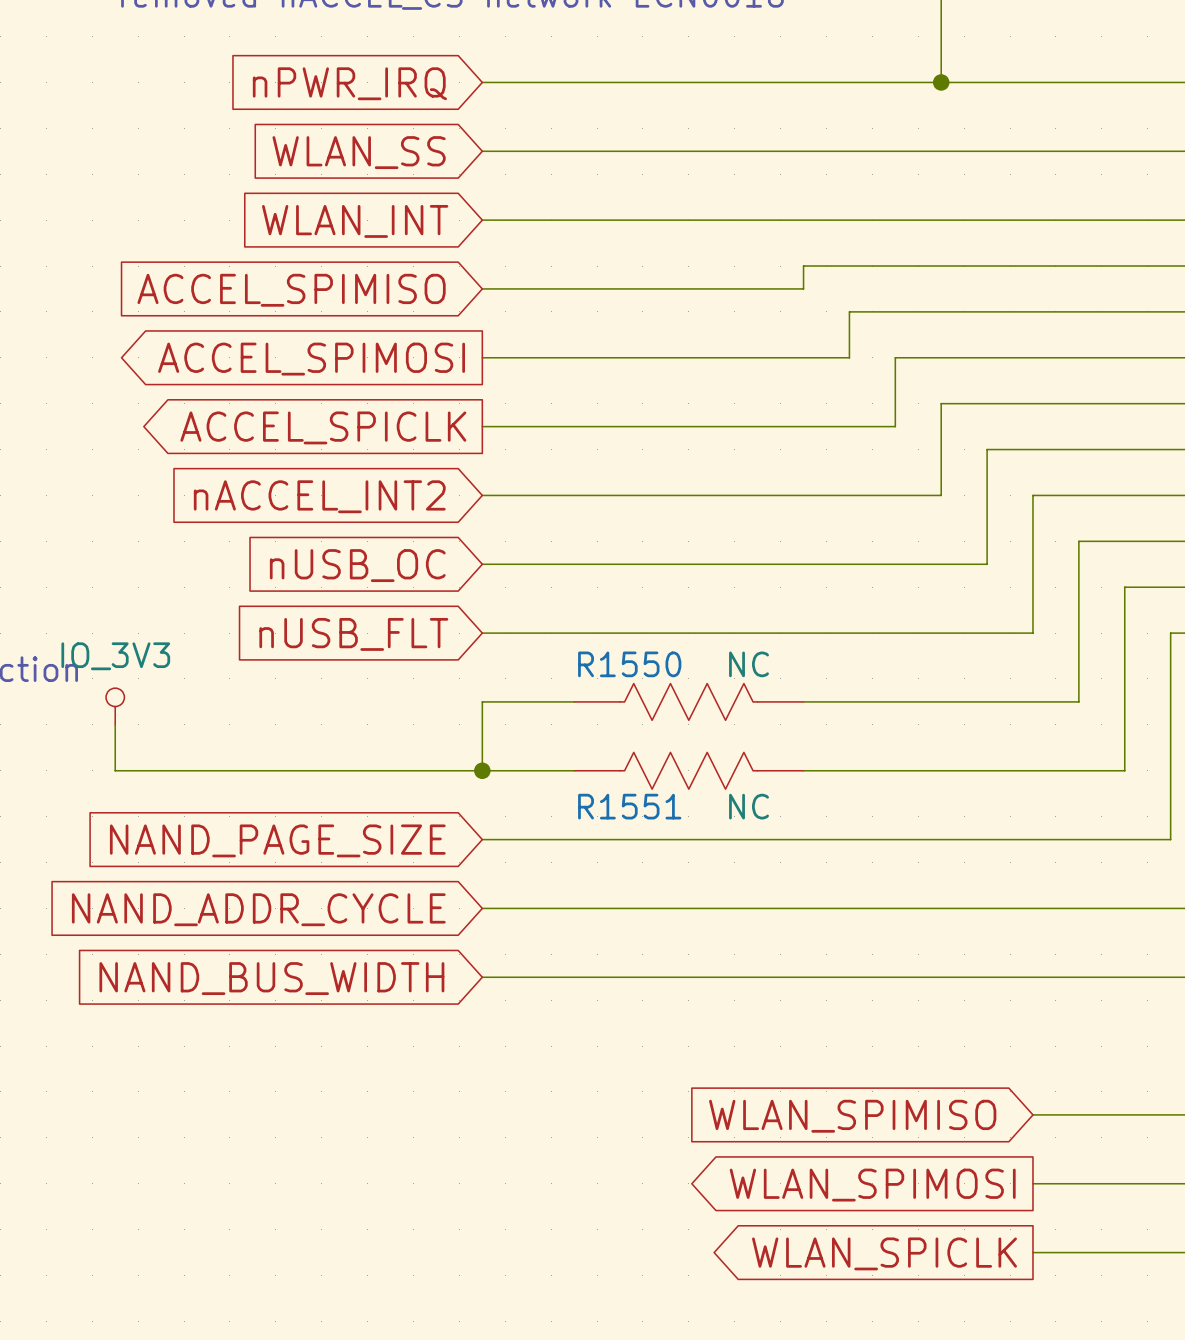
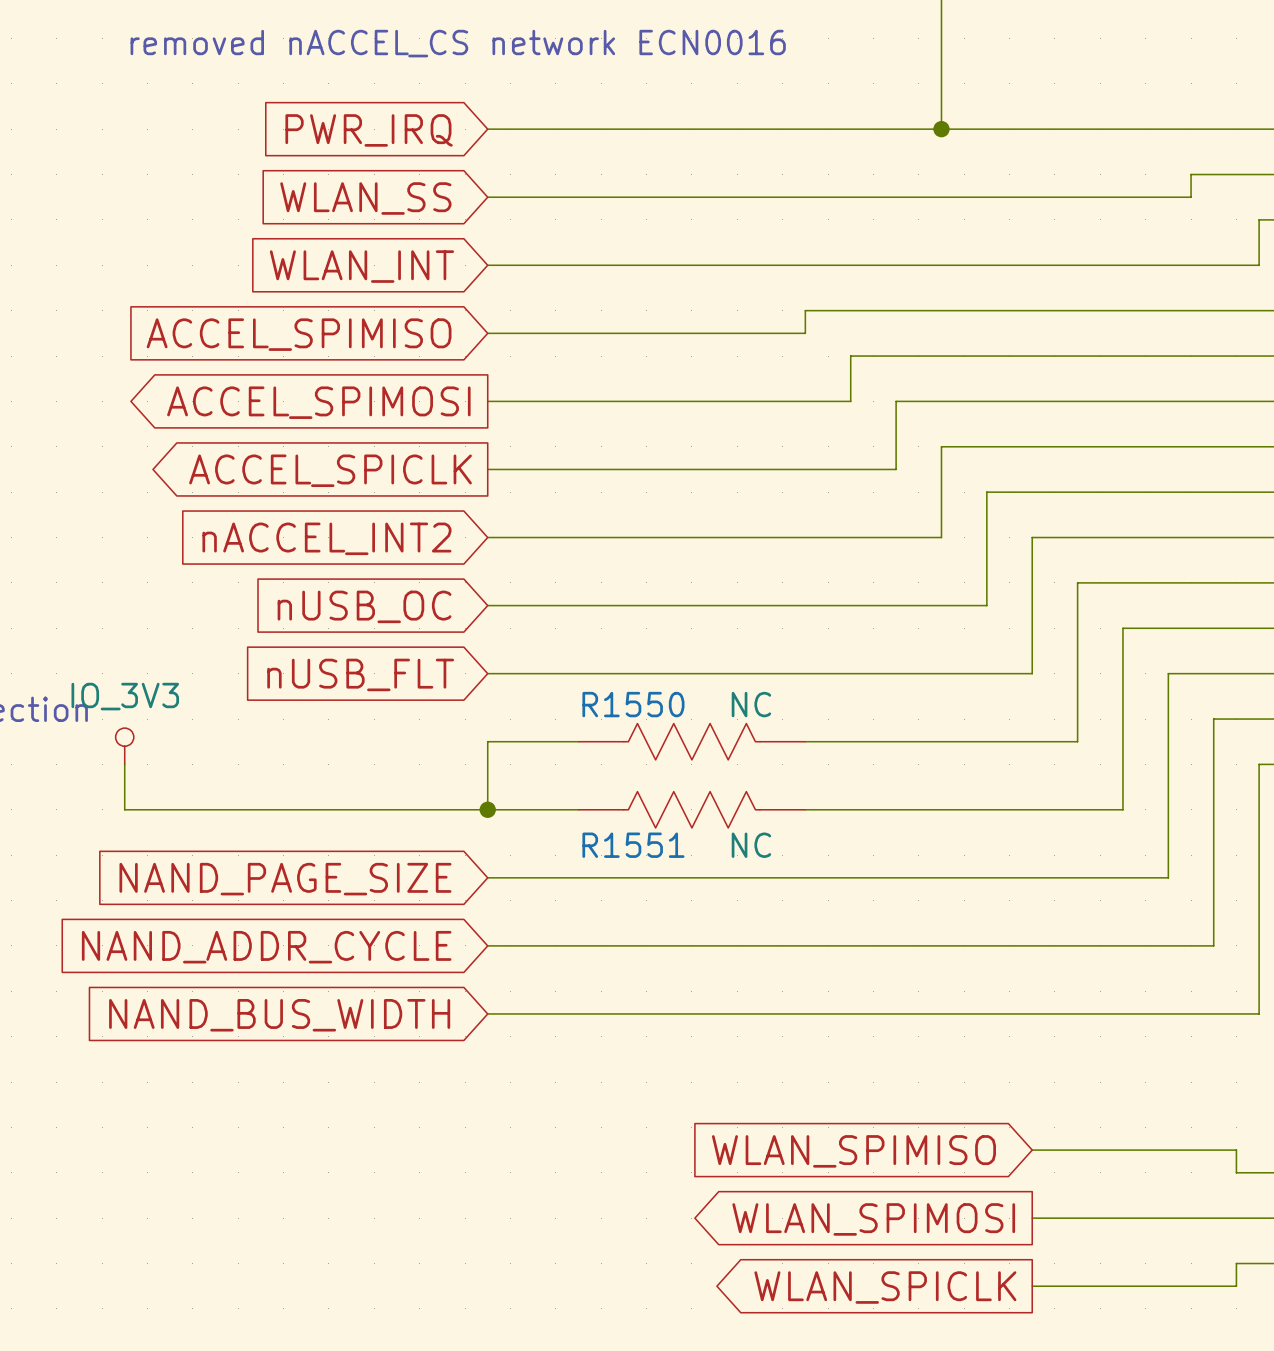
global label: nPWR_IRQ (349, 83) -> PWR_IRQ (369, 130)

